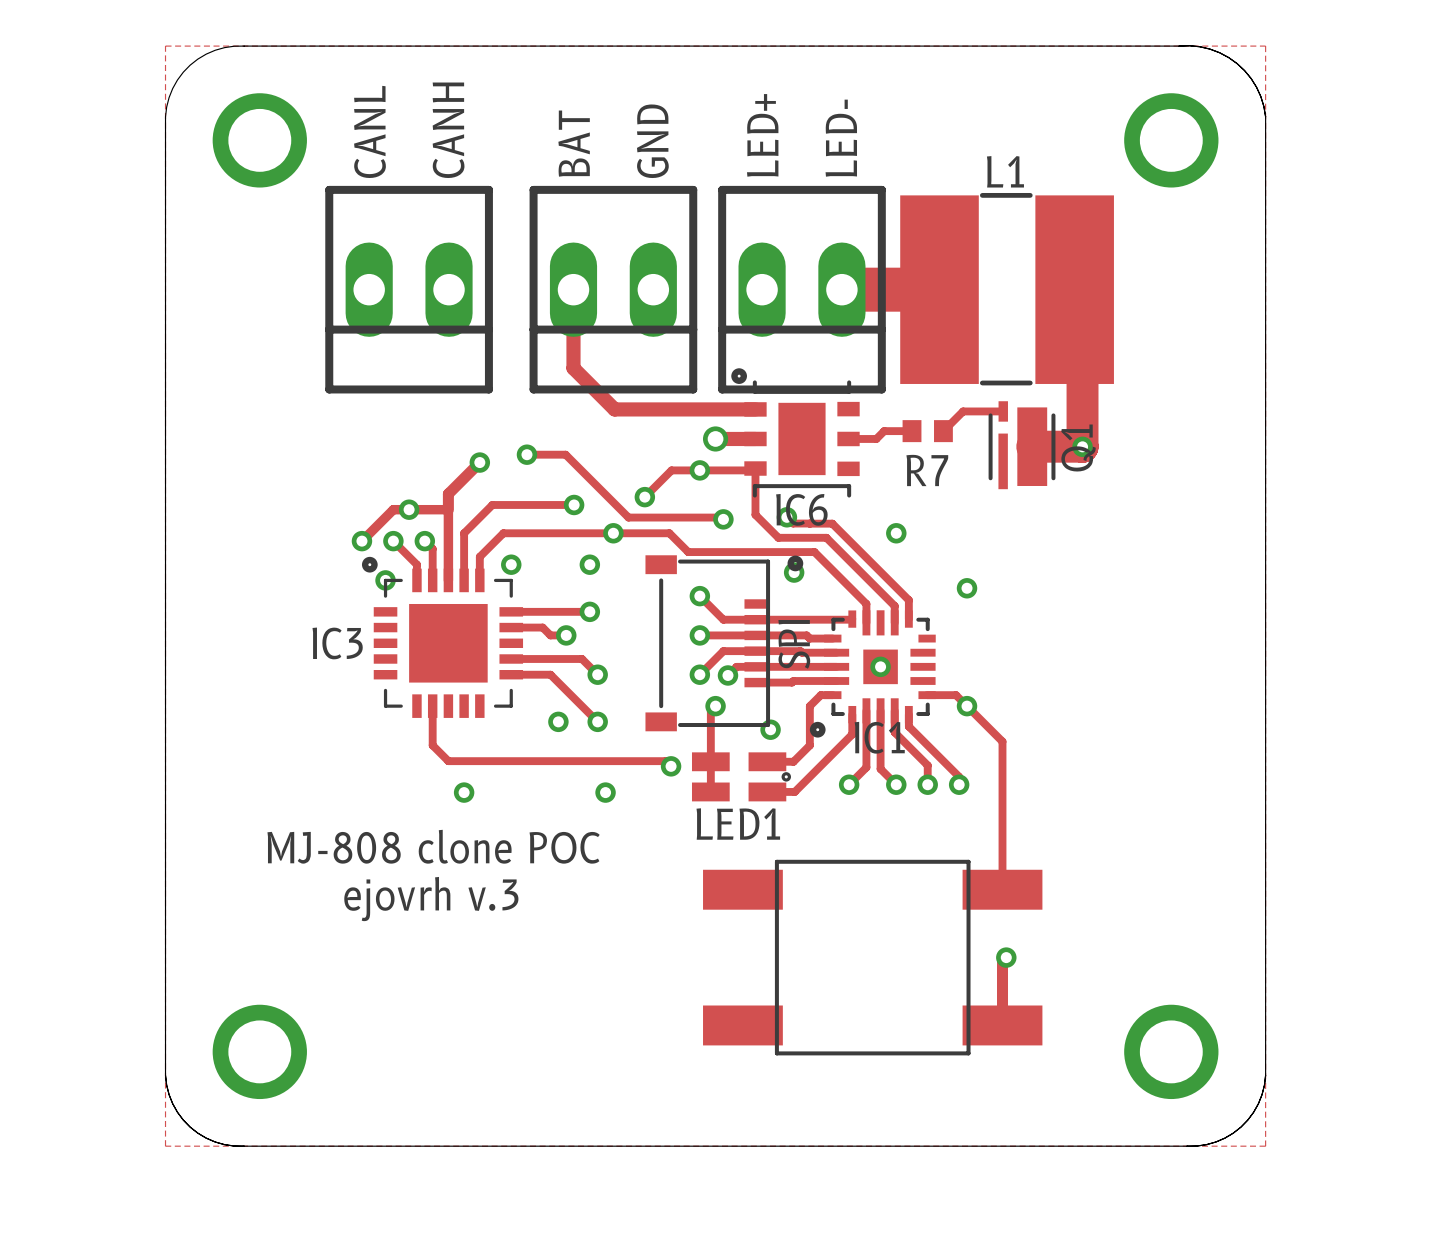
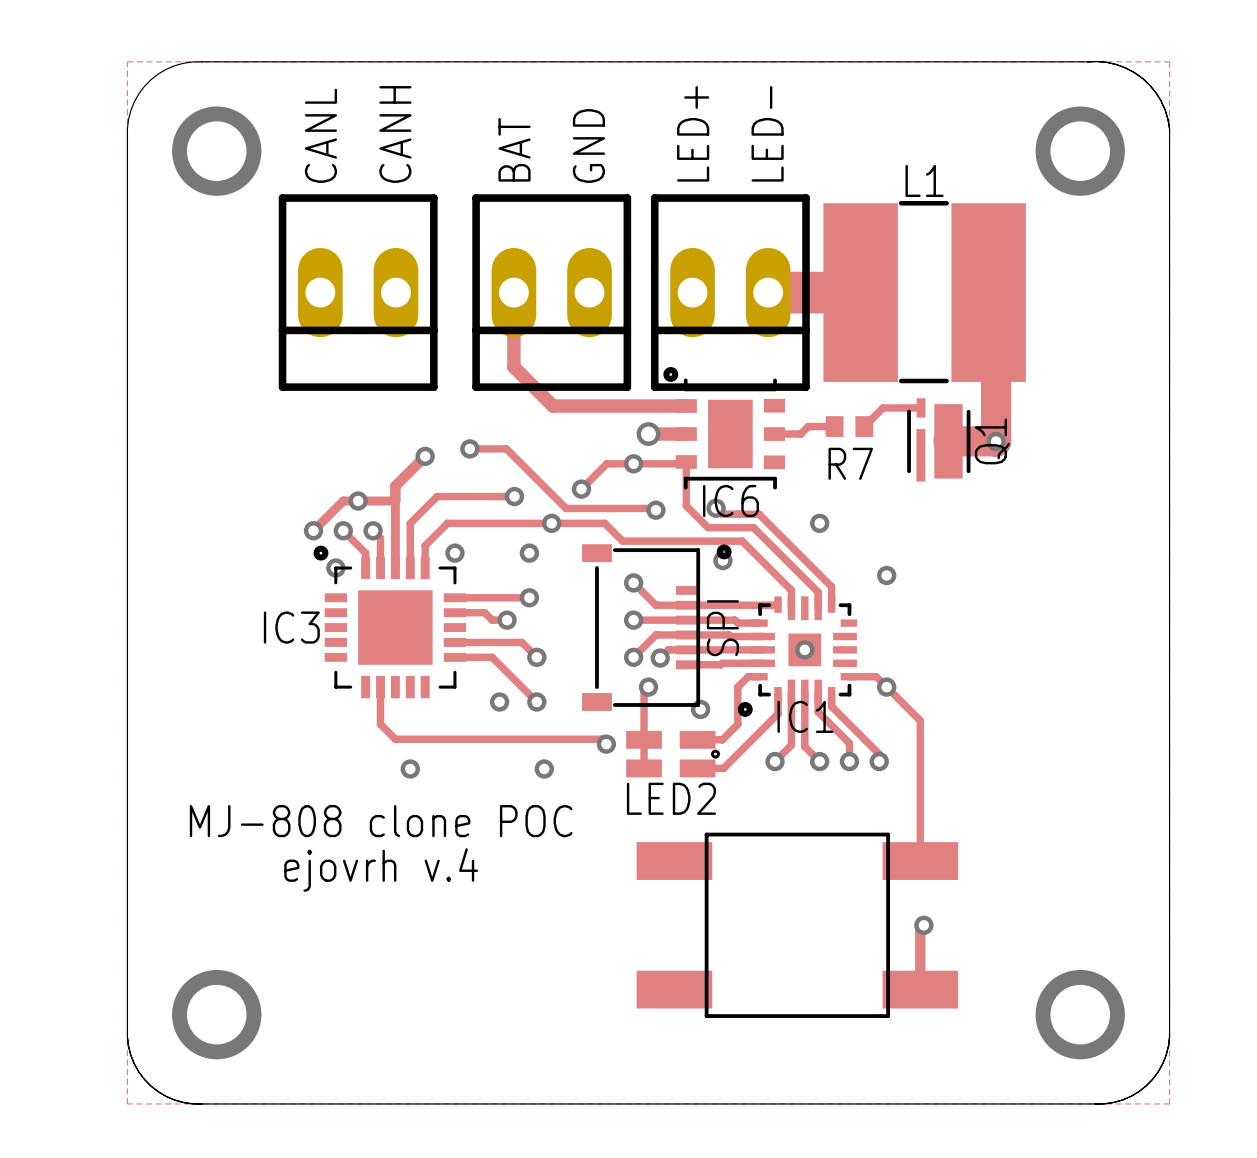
LED1 name: LED1 (738, 824) -> LED2 (671, 798)
text: ejovrh v.3 (431, 899) -> ejovrh v.4 (381, 870)

